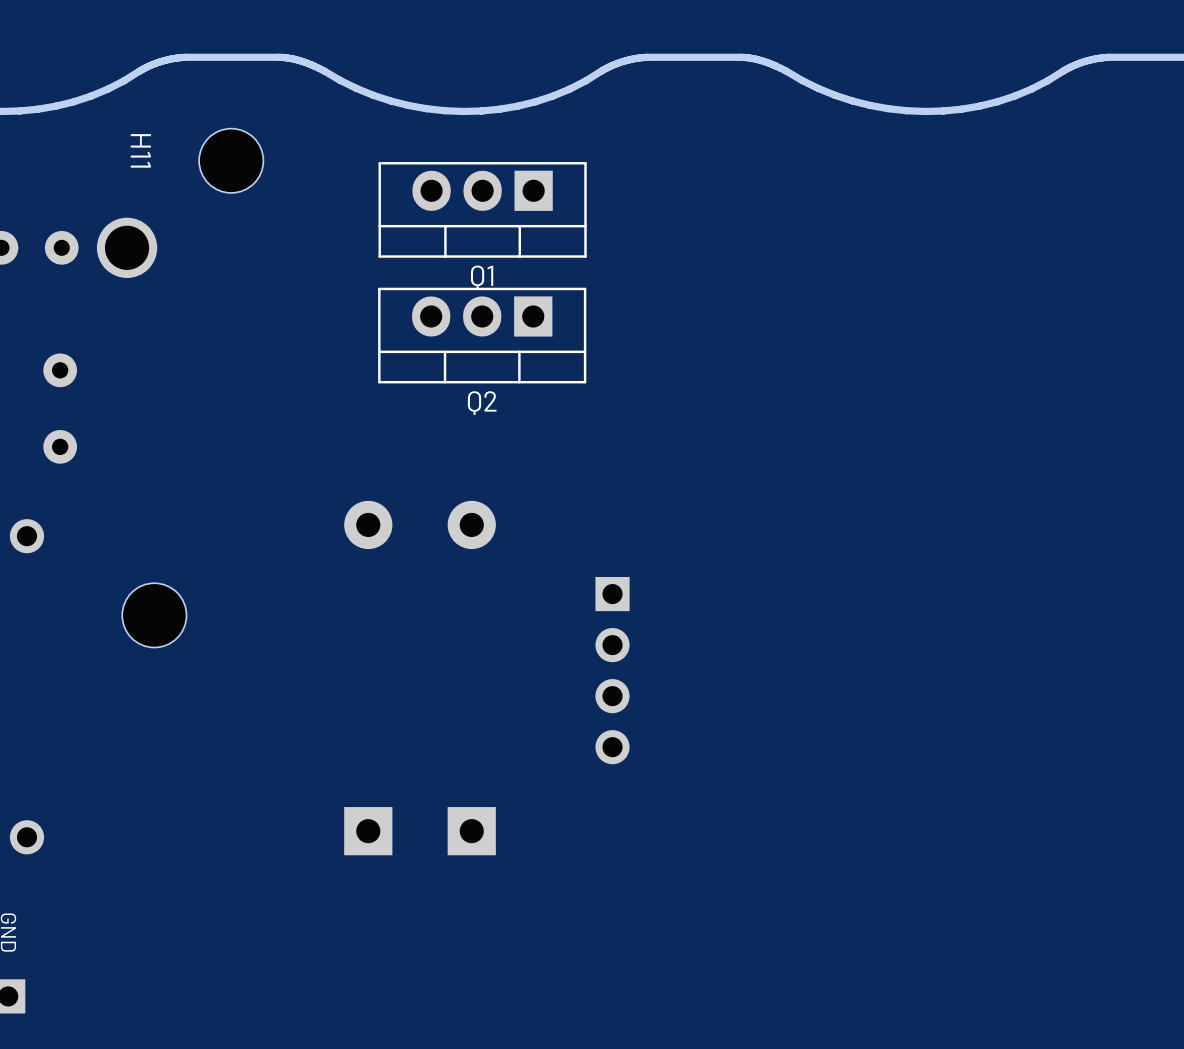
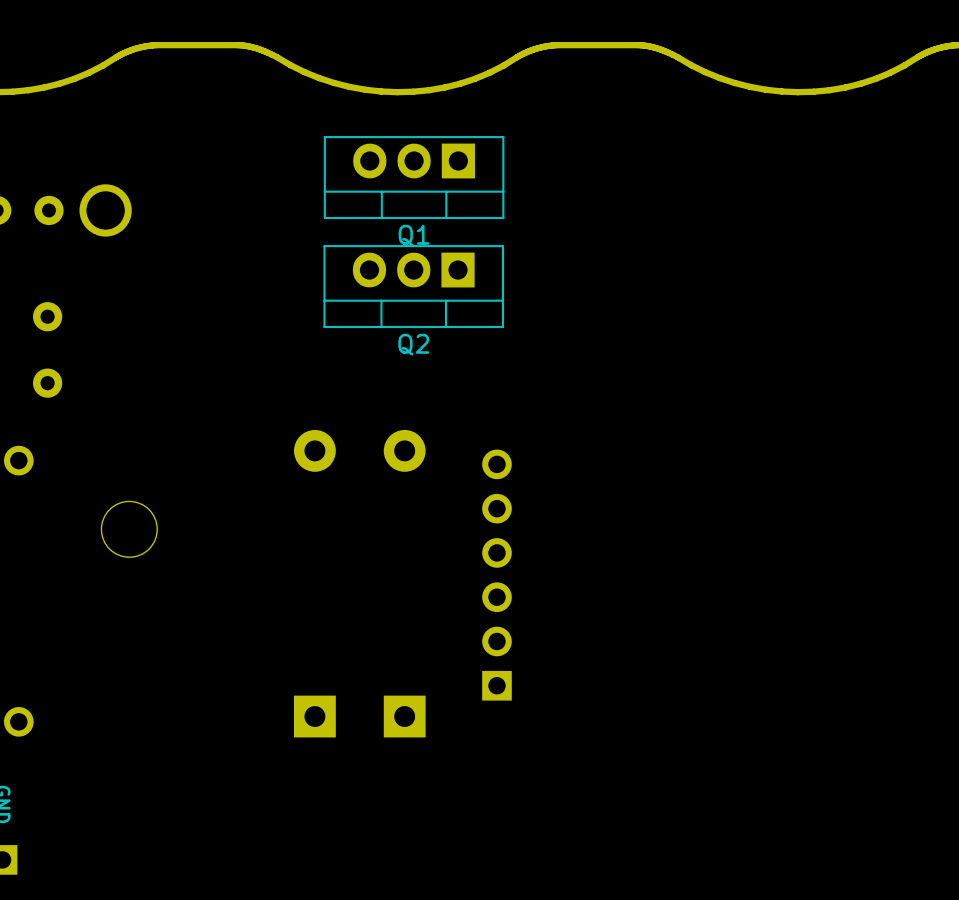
H11: (231, 160) -> none
part: none -> (496, 575)
part: (612, 670) -> none

